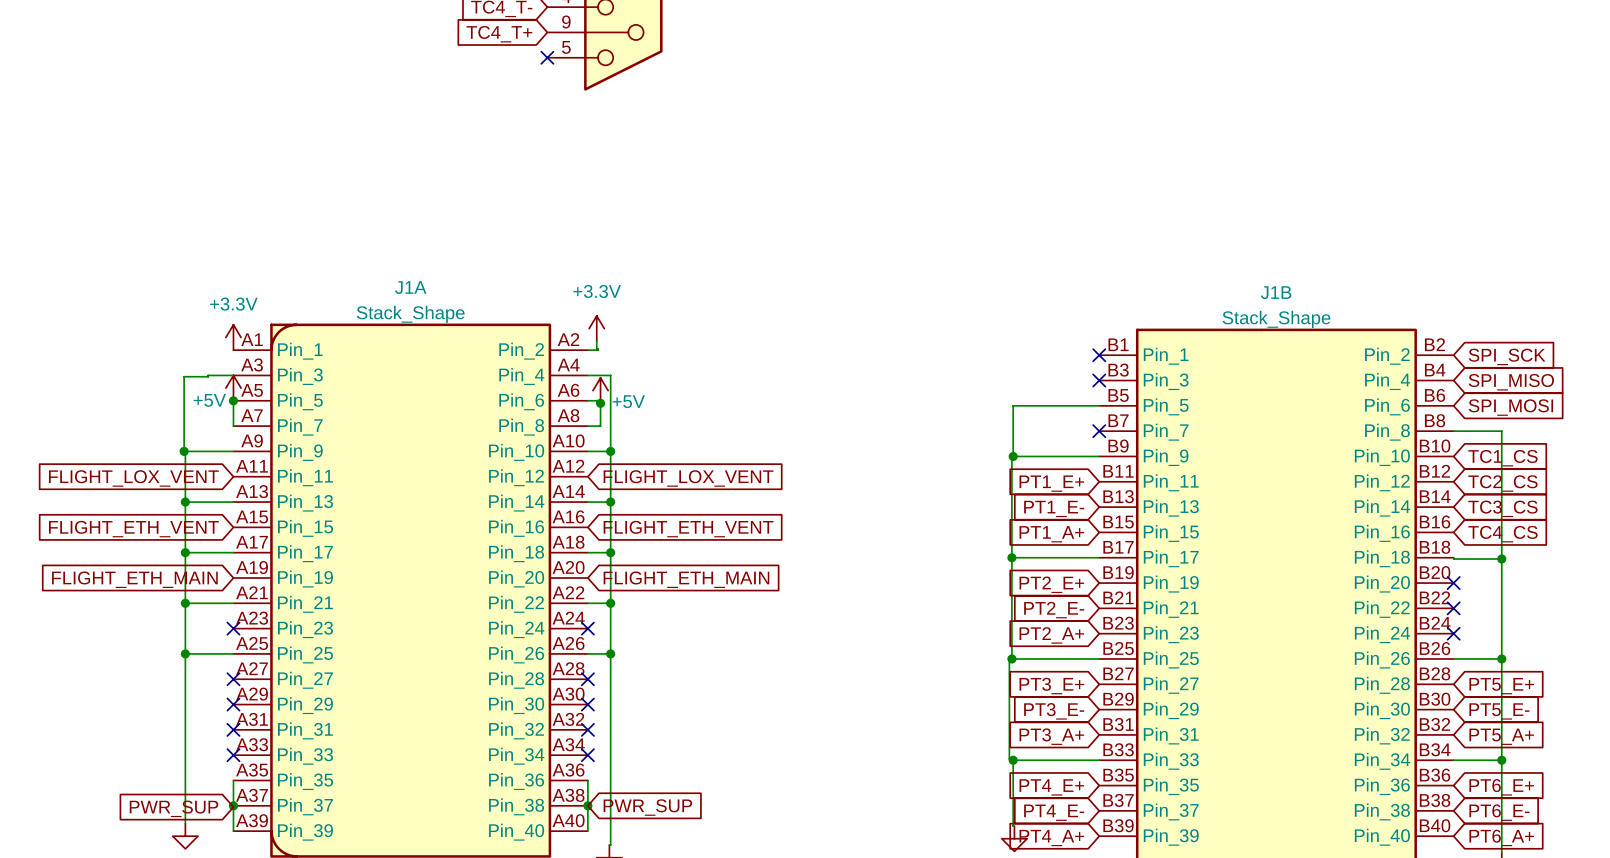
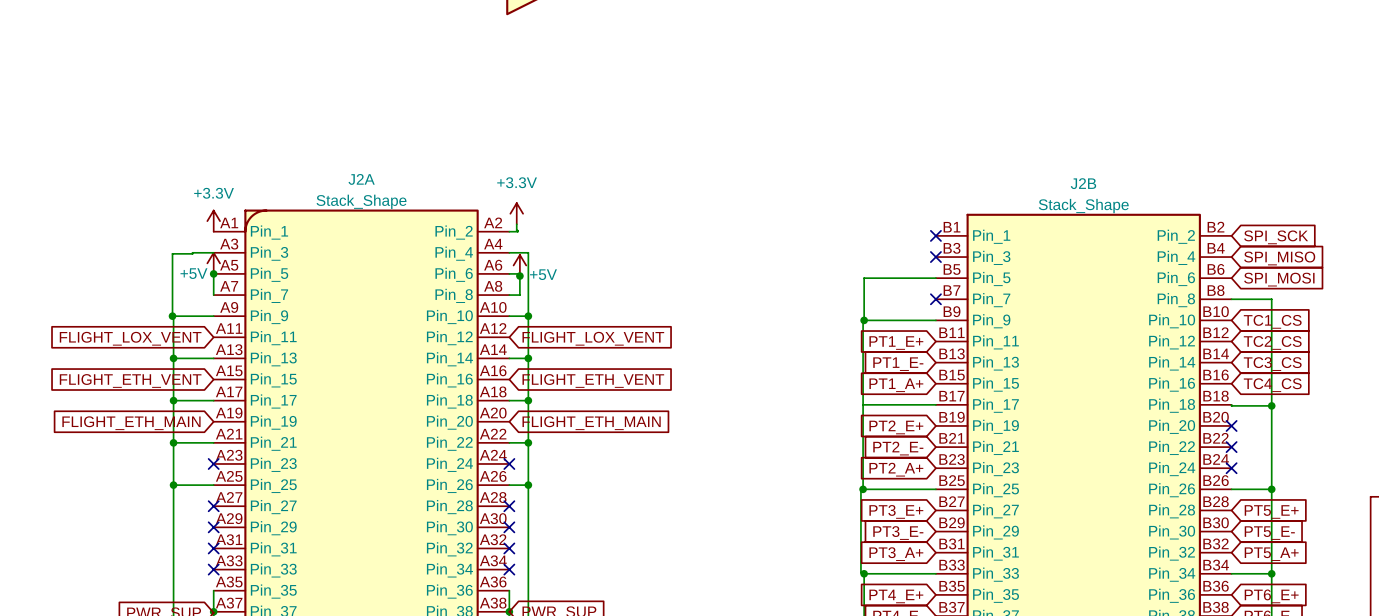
J1A name: J1A (410, 287) -> J2A (361, 179)
J1B name: J1B (1276, 292) -> J2B (1083, 183)
junction: (1011, 557) -> none

